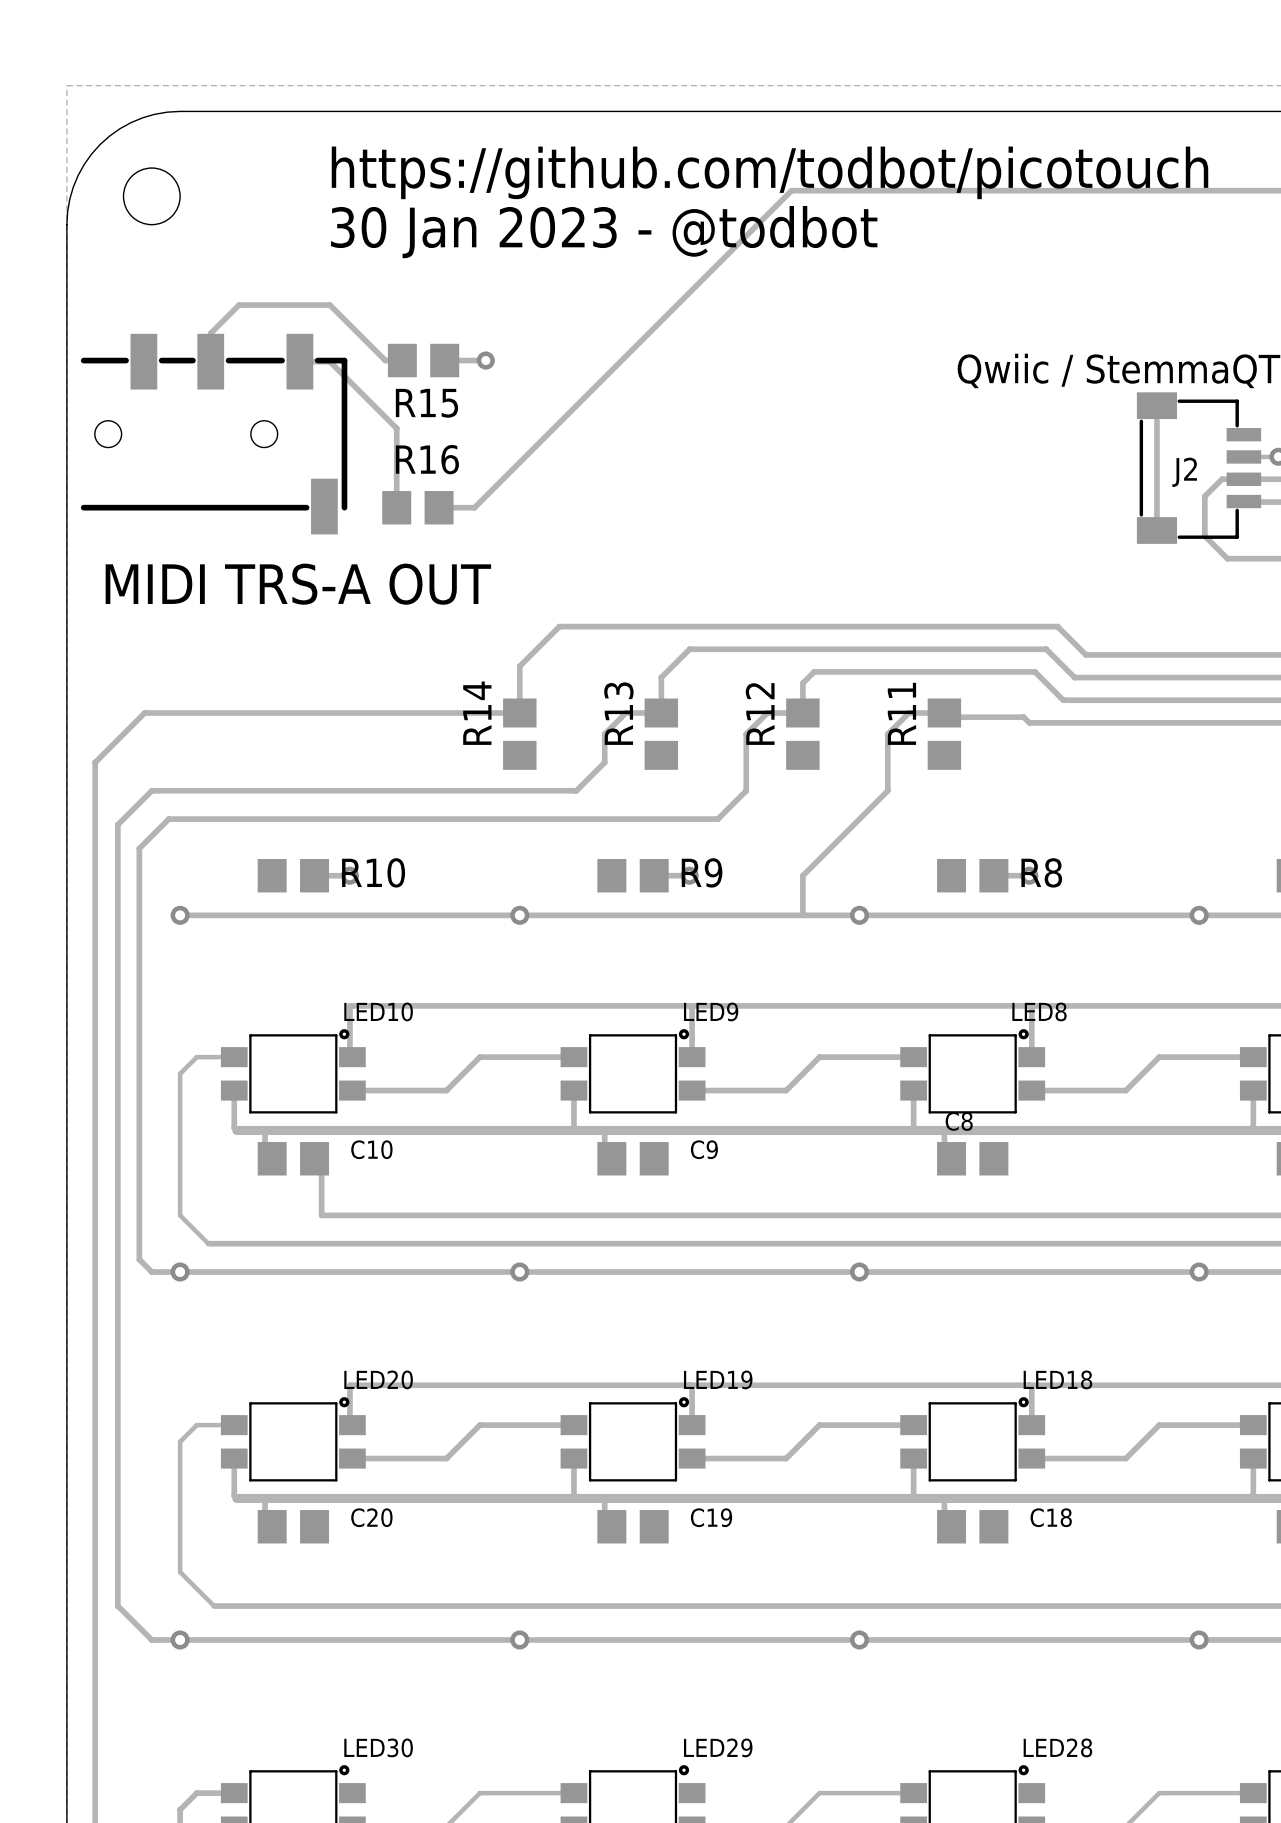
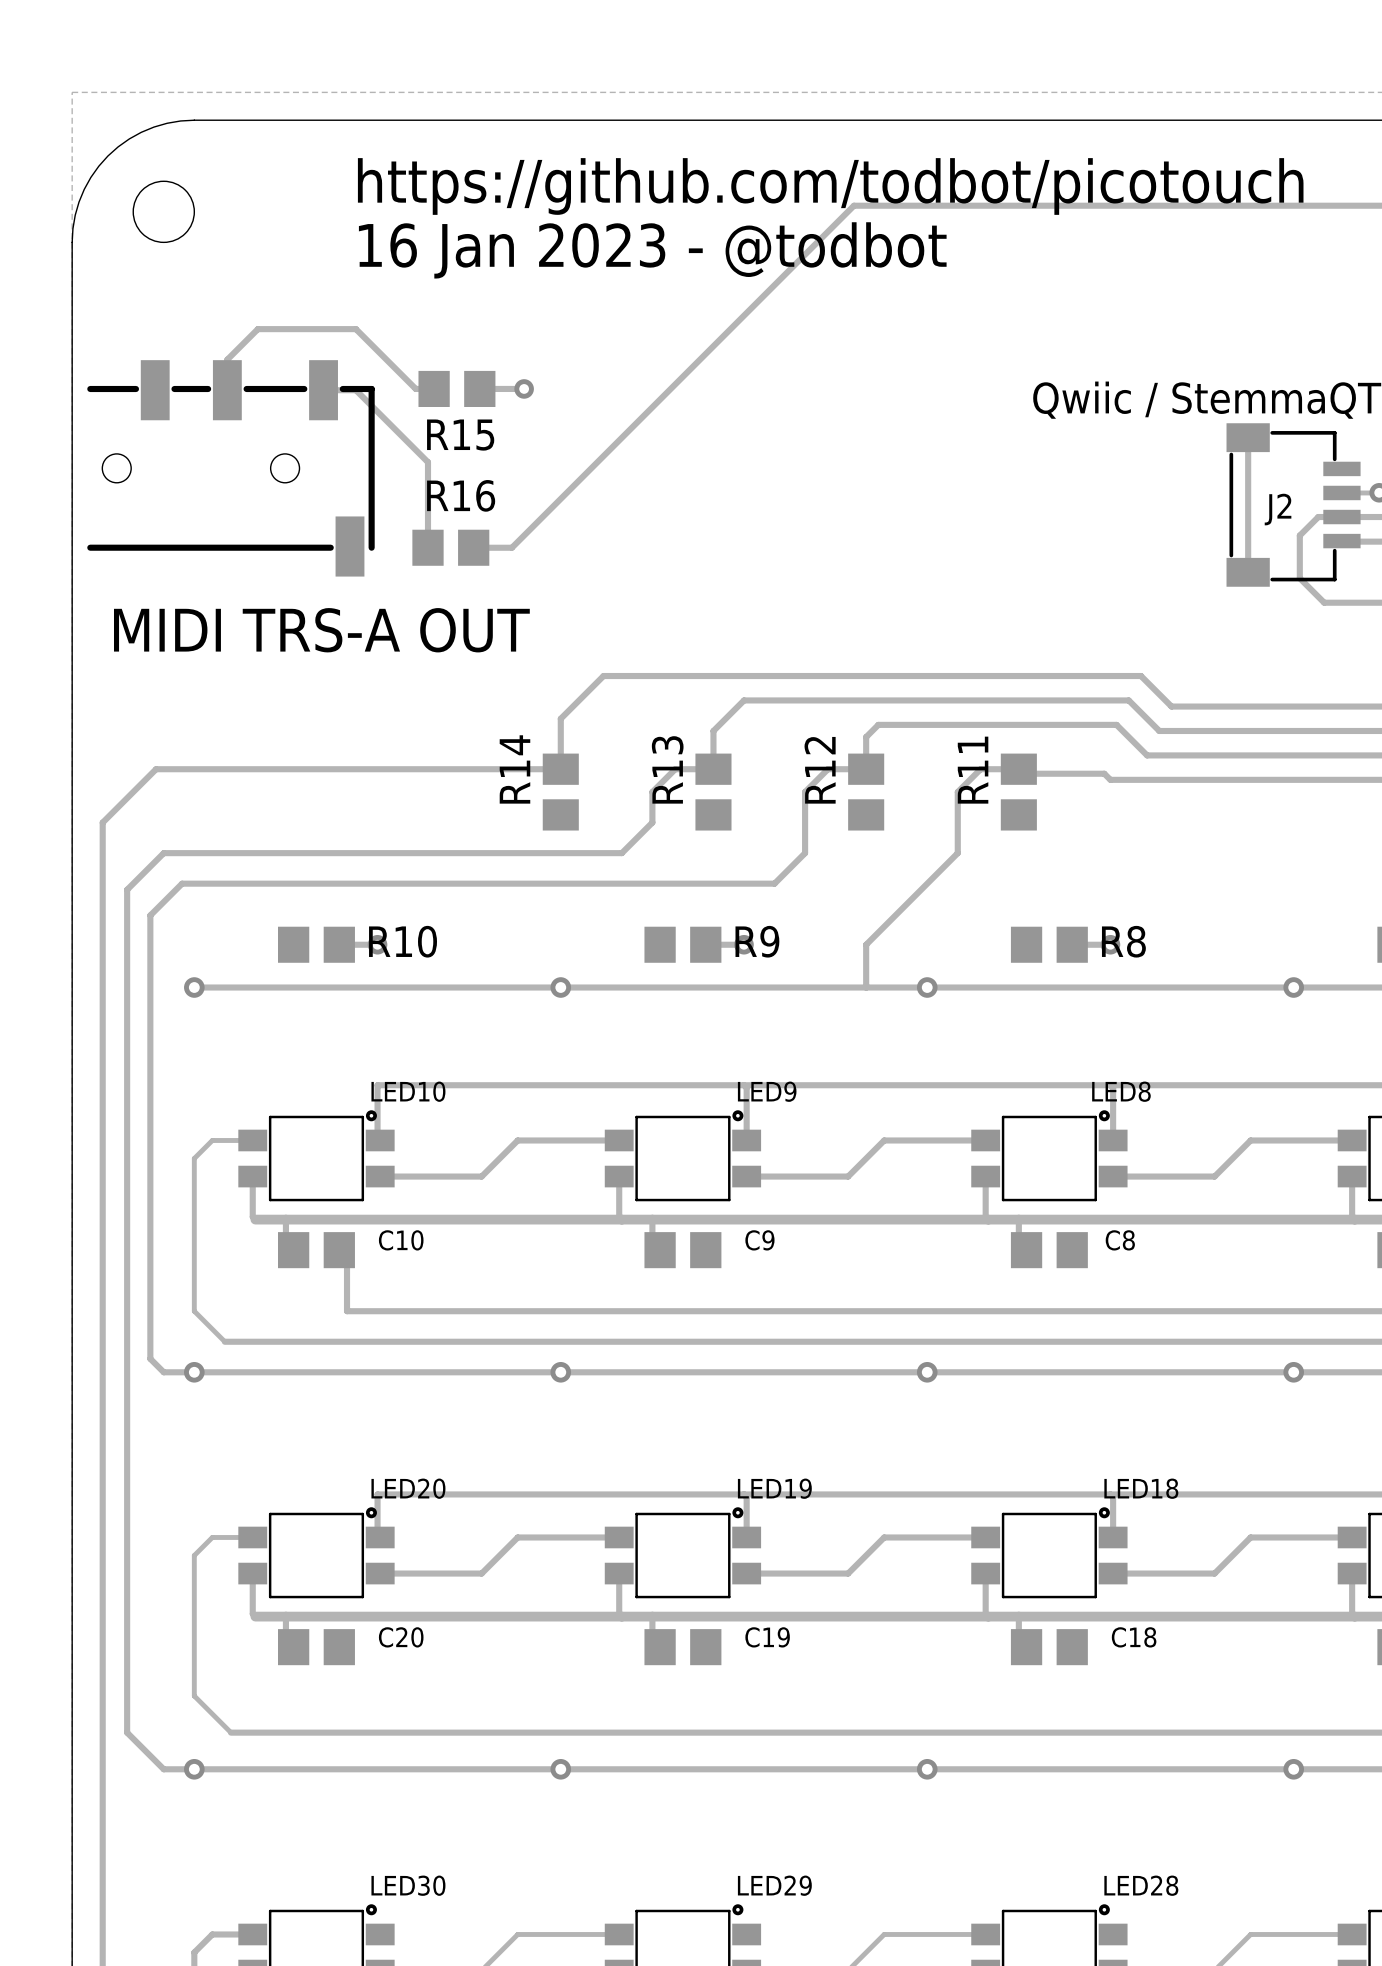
text: 30 Jan 2023 - @todbot (604, 232) -> 16 Jan 2023 - @todbot (652, 250)
C8 name position: C8 (959, 1121) -> C8 (1120, 1240)

